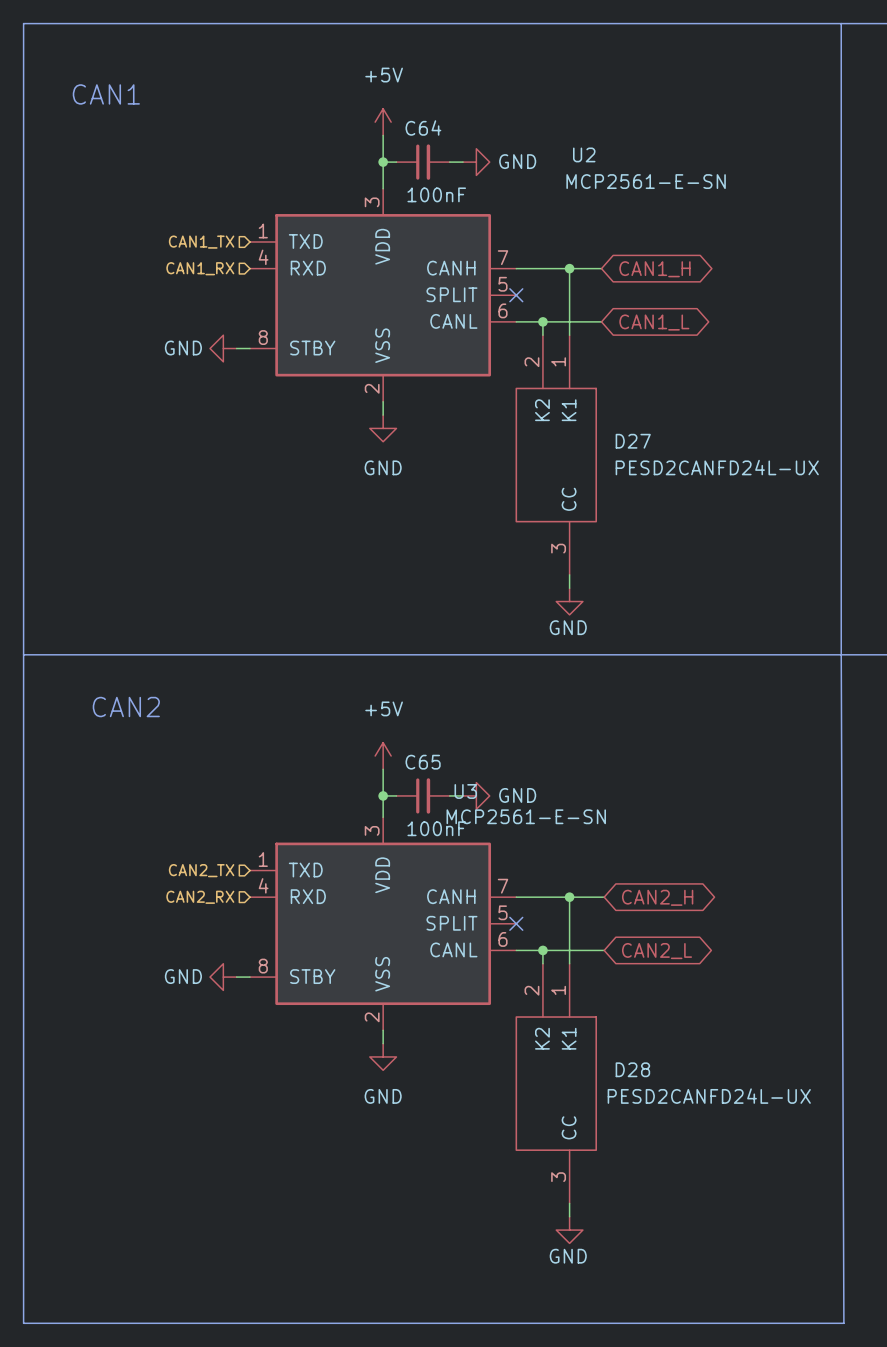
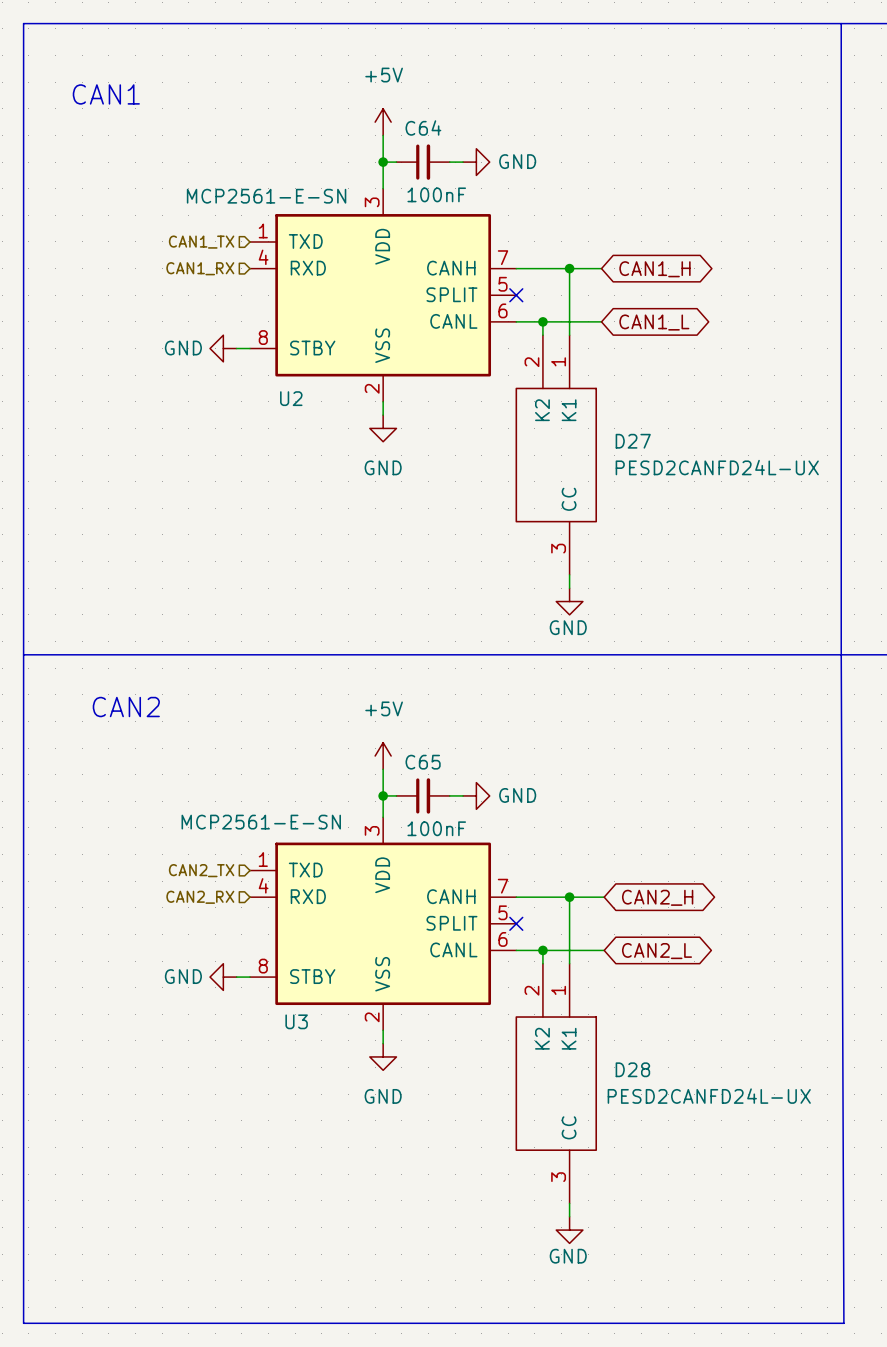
U2 name position: U2 (584, 154) -> U2 (291, 398)
U2 value position: MCP2561-E-SN (646, 181) -> MCP2561-E-SN (266, 196)
U3 name position: U3 (465, 791) -> U3 (296, 1021)
U3 value position: MCP2561-E-SN (526, 816) -> MCP2561-E-SN (261, 822)

